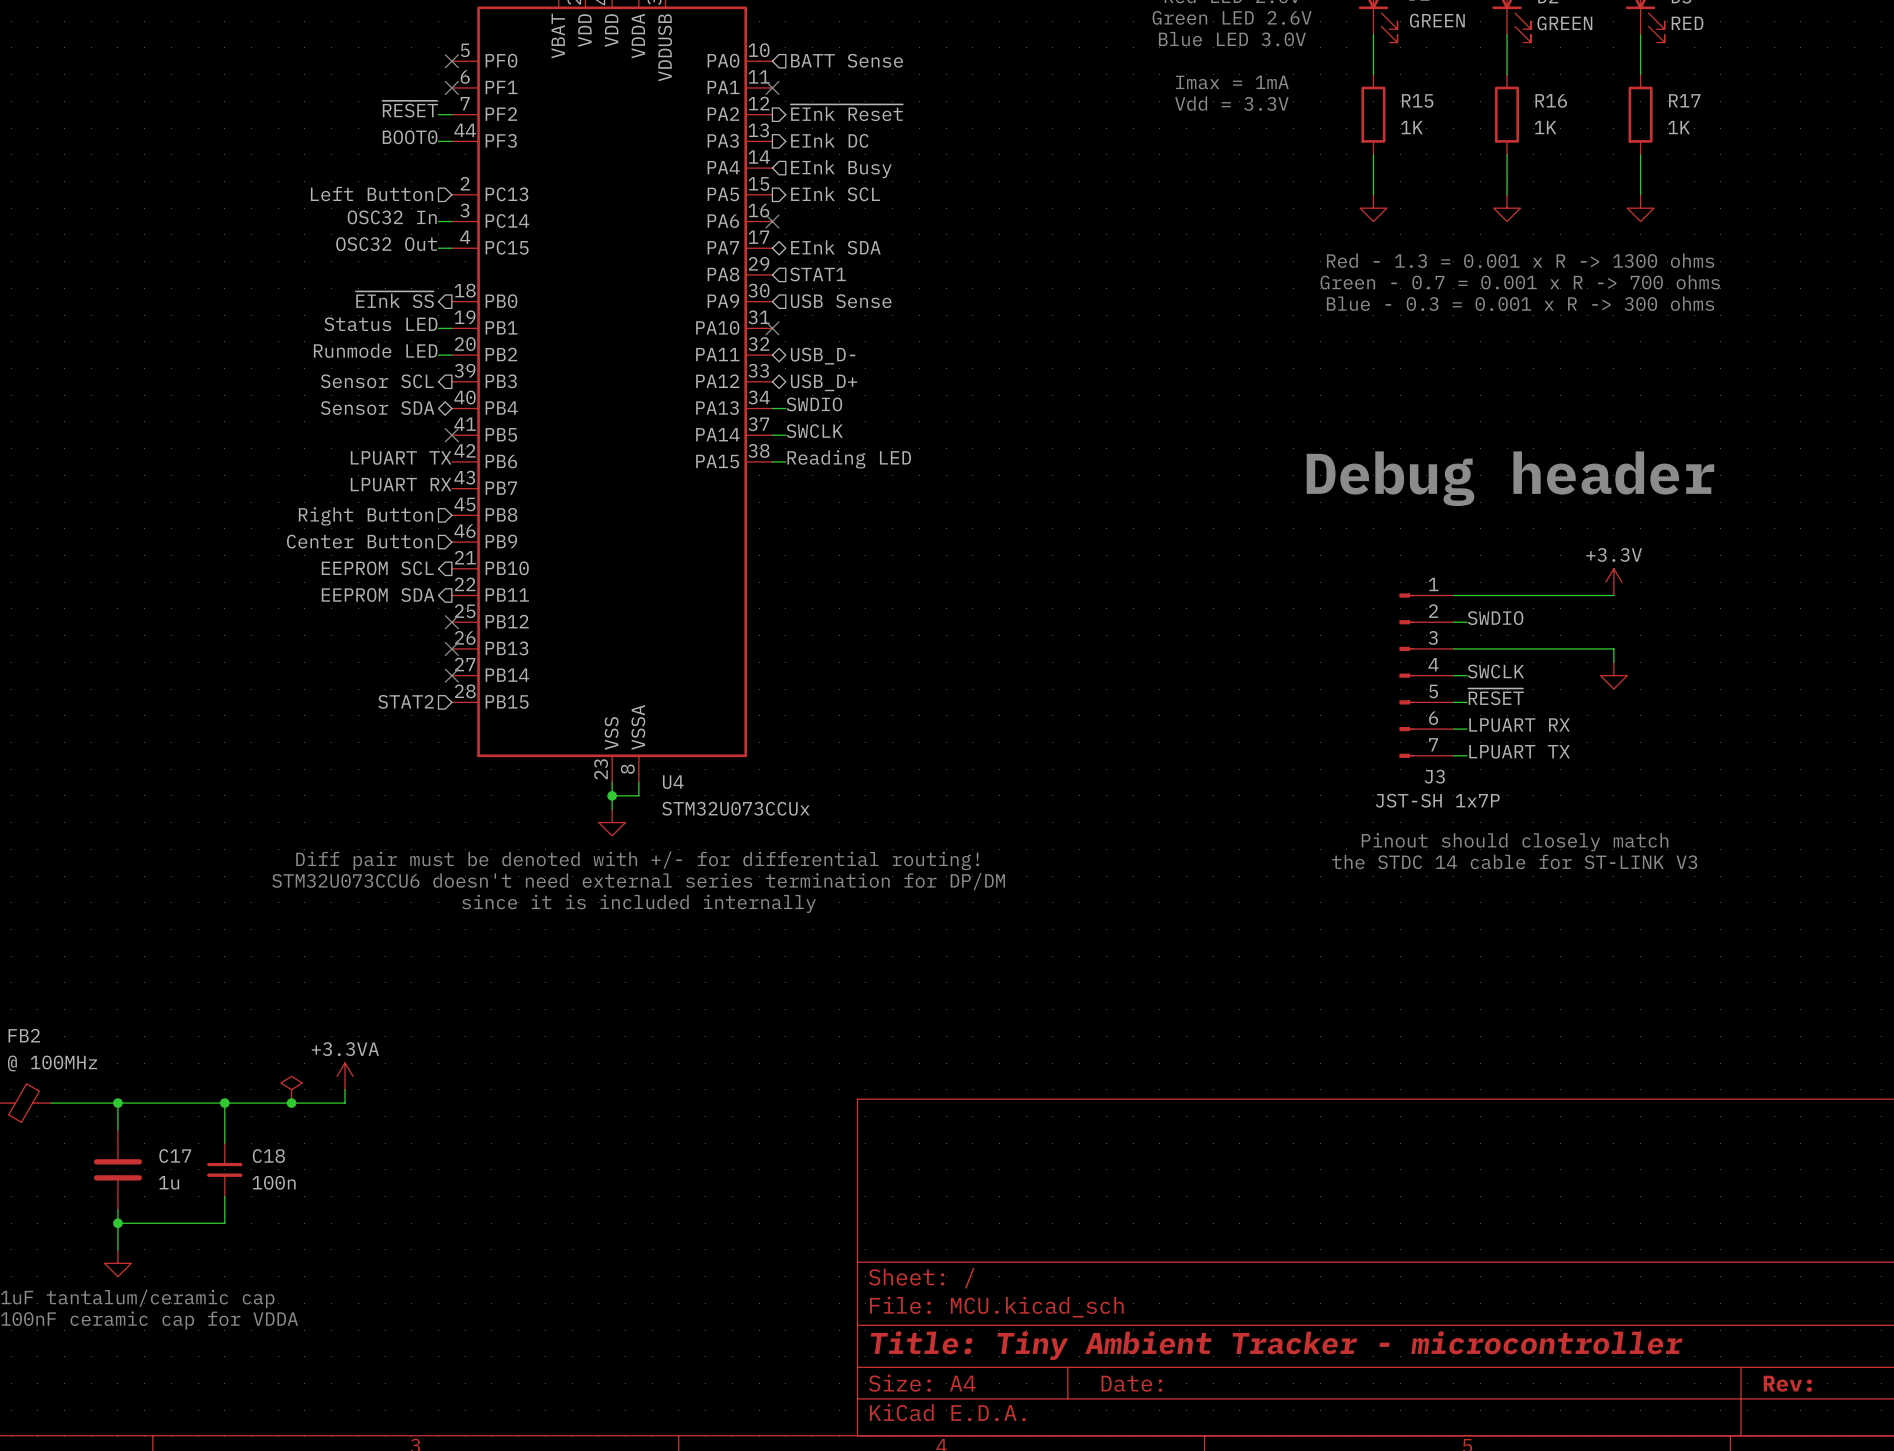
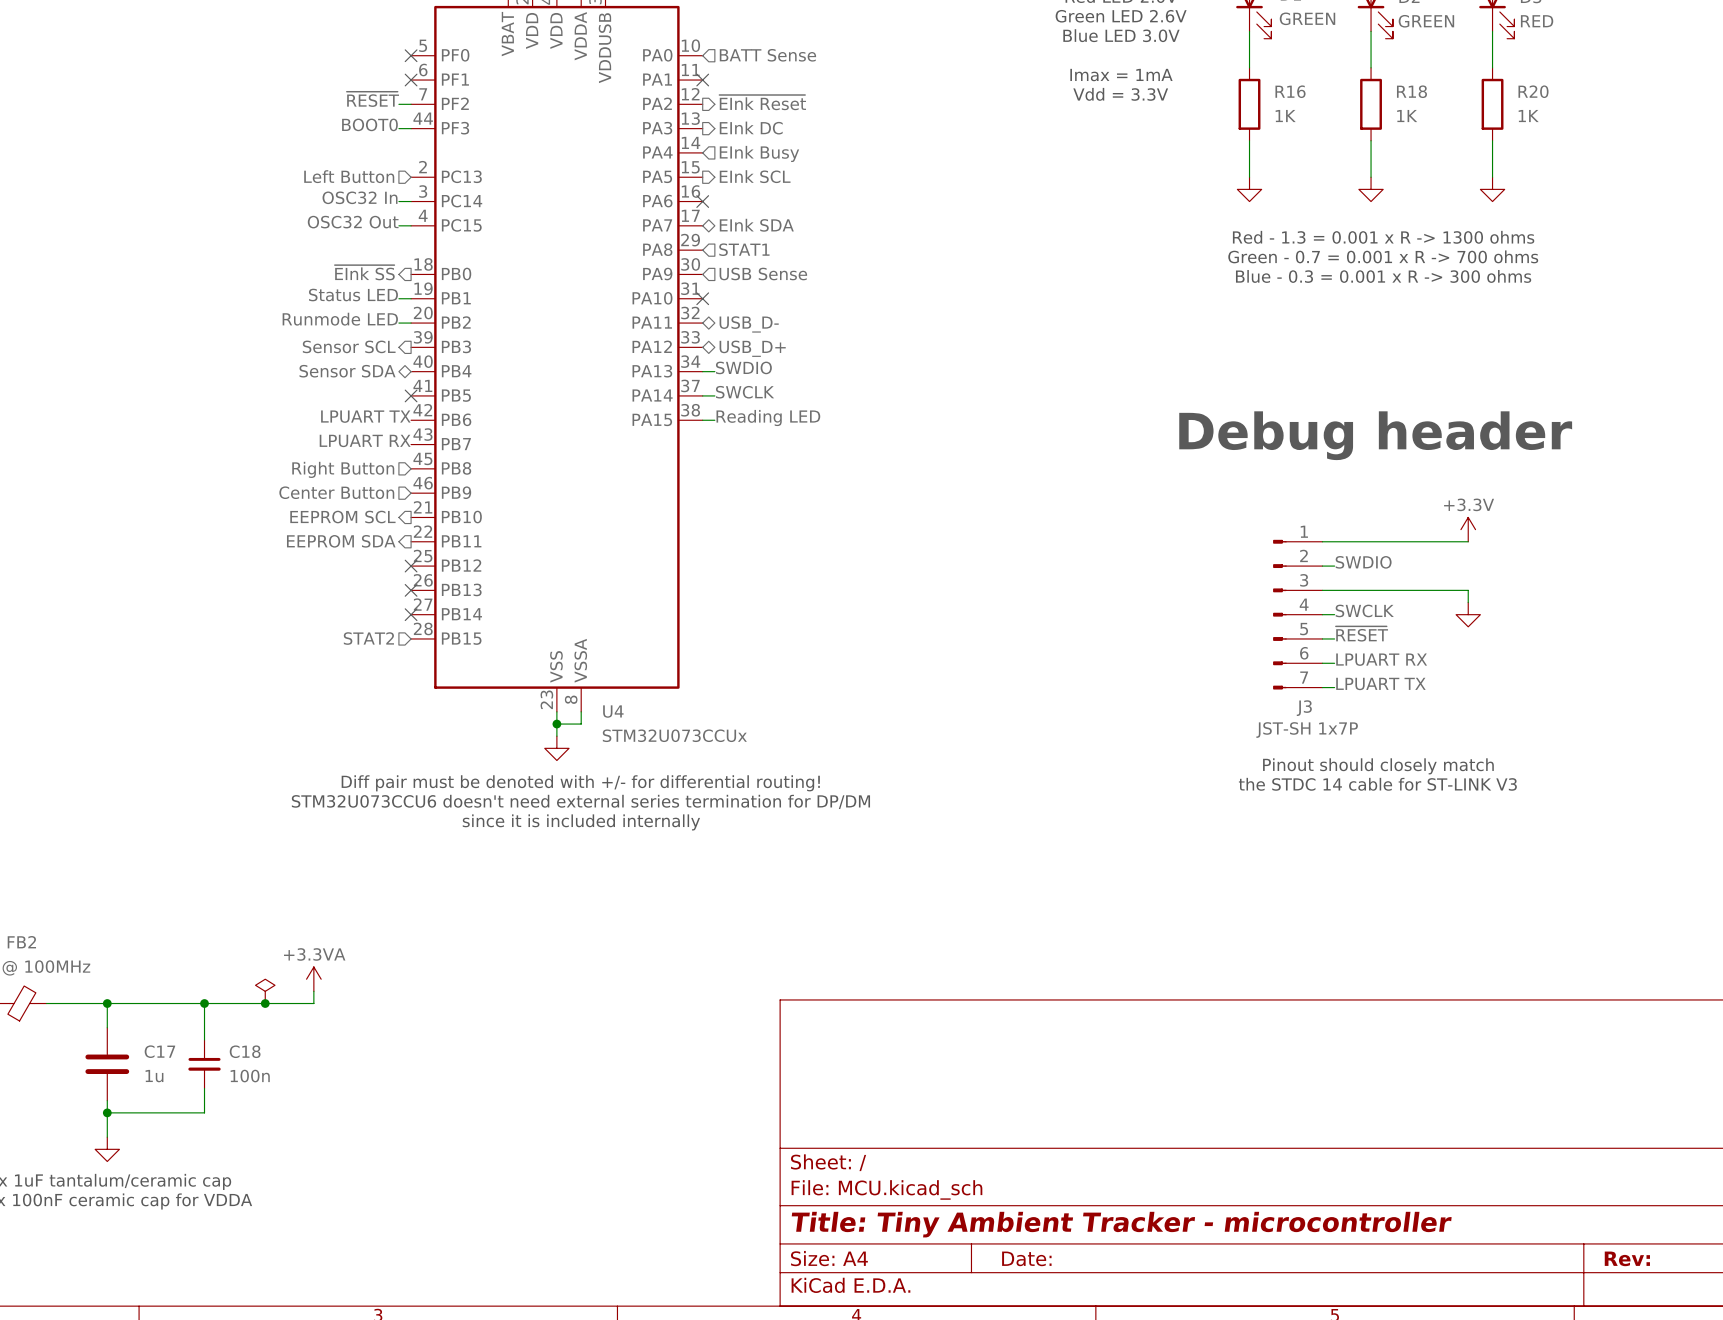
R15 name: R15 (1417, 100) -> R16 (1290, 91)
R16 name: R16 (1551, 100) -> R18 (1411, 91)
R17 name: R17 (1684, 100) -> R20 (1533, 91)

